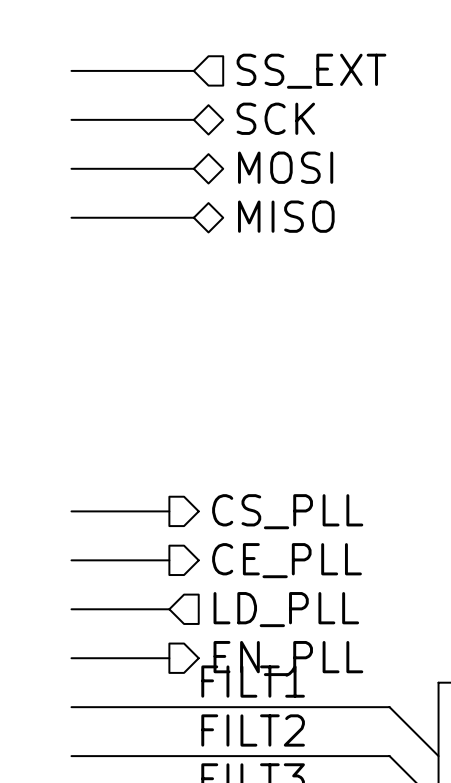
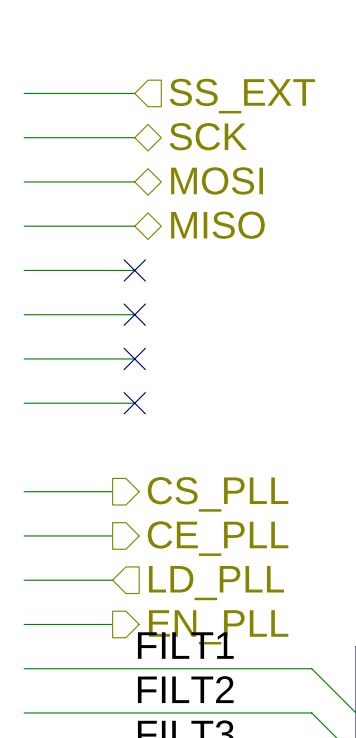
wire: none -> (24, 270) (134, 270)
no-connect mark: none -> (134, 270)
wire: none -> (24, 314) (134, 314)
no-connect mark: none -> (134, 314)
wire: none -> (24, 358) (134, 358)
no-connect mark: none -> (134, 358)
wire: none -> (24, 403) (134, 403)
no-connect mark: none -> (134, 403)

